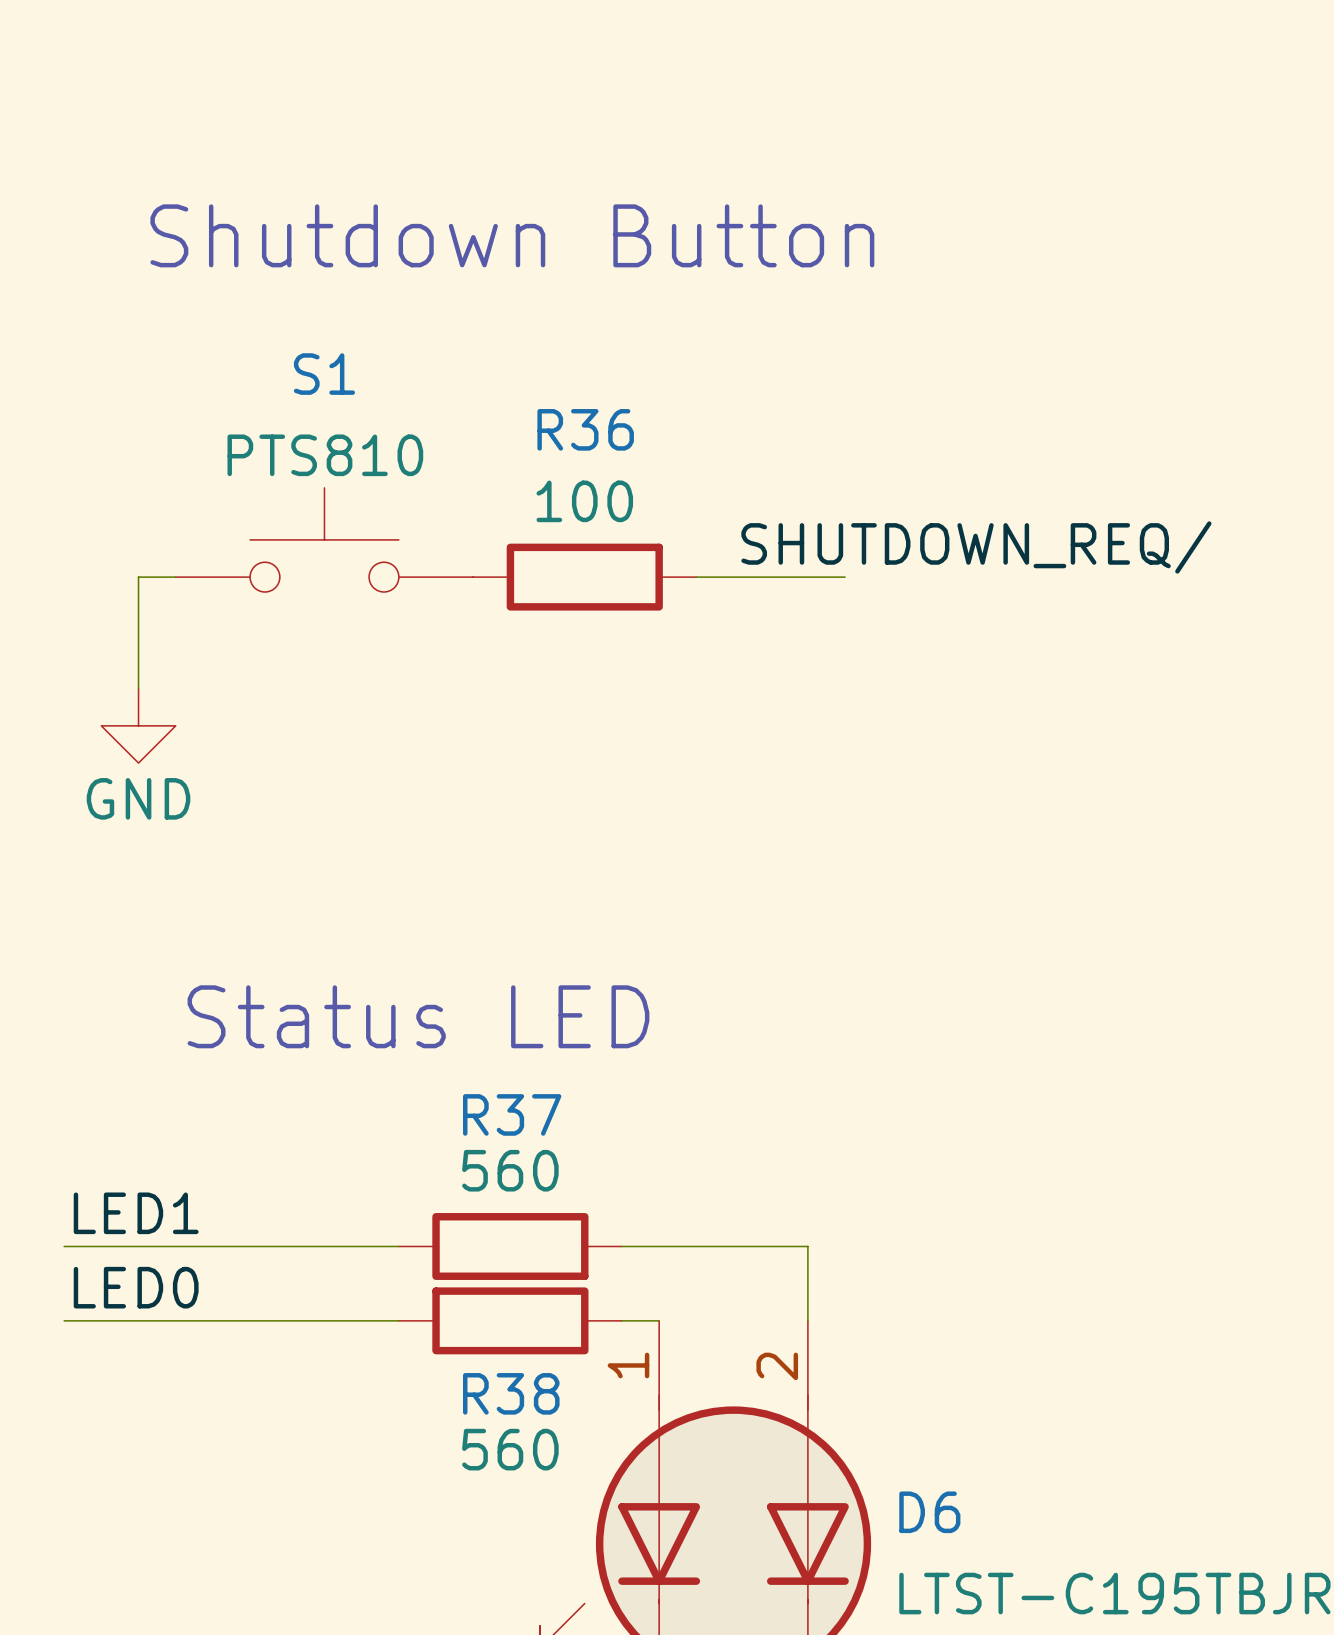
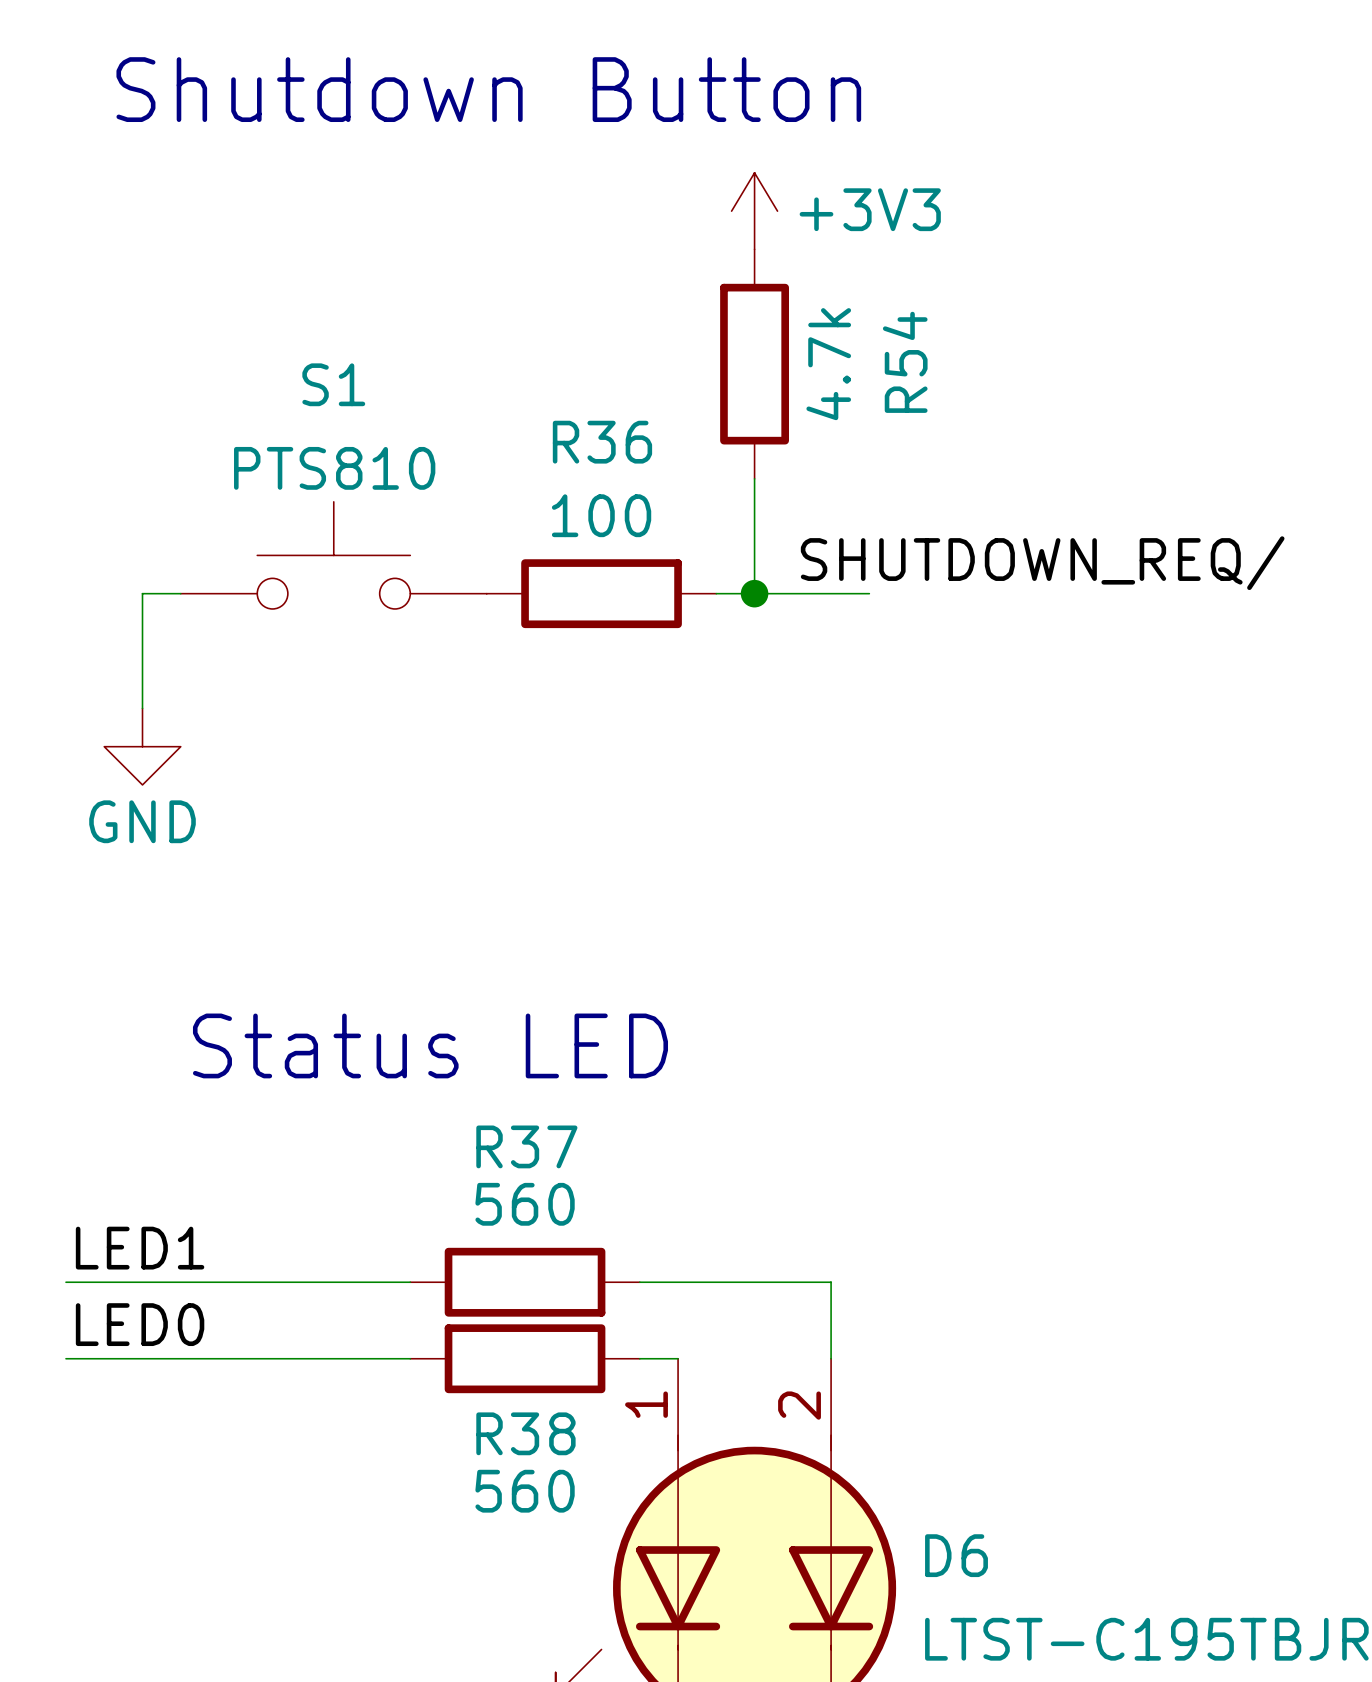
power symbol: none -> +3V3 (754, 211)
text position: Shutdown Button (512, 235) -> Shutdown Button (488, 89)
R54: none -> 4.7k (754, 364)
wire: none -> (754, 478) (754, 593)
label position: SHUTDOWN_REQ/ (976, 547) -> SHUTDOWN_REQ/ (1042, 563)
junction: none -> (754, 593)

